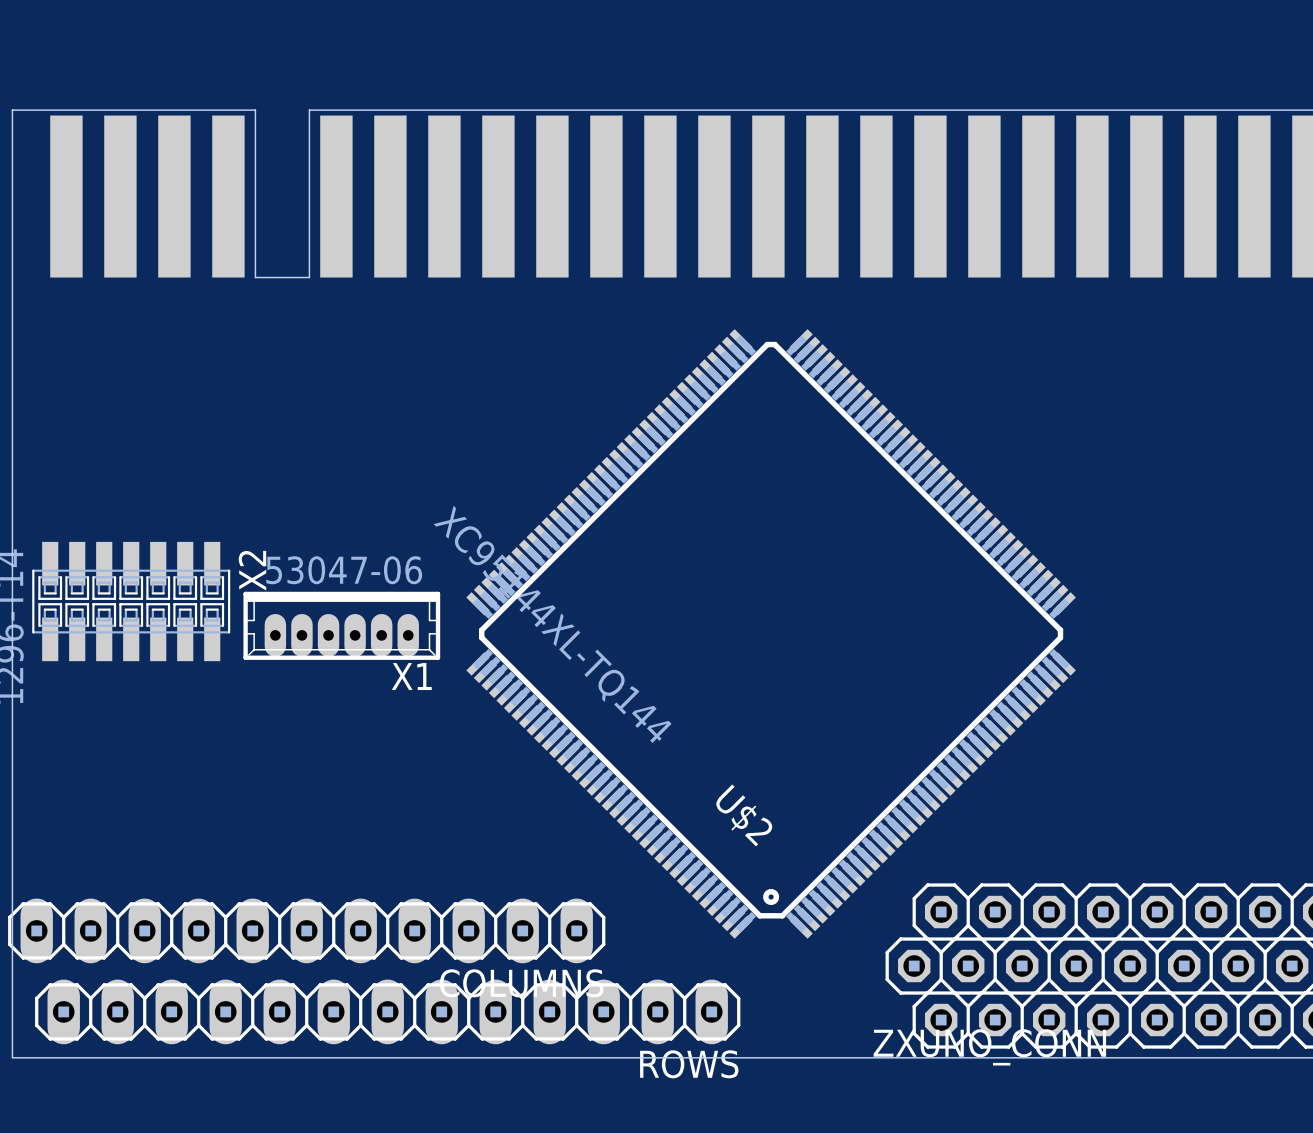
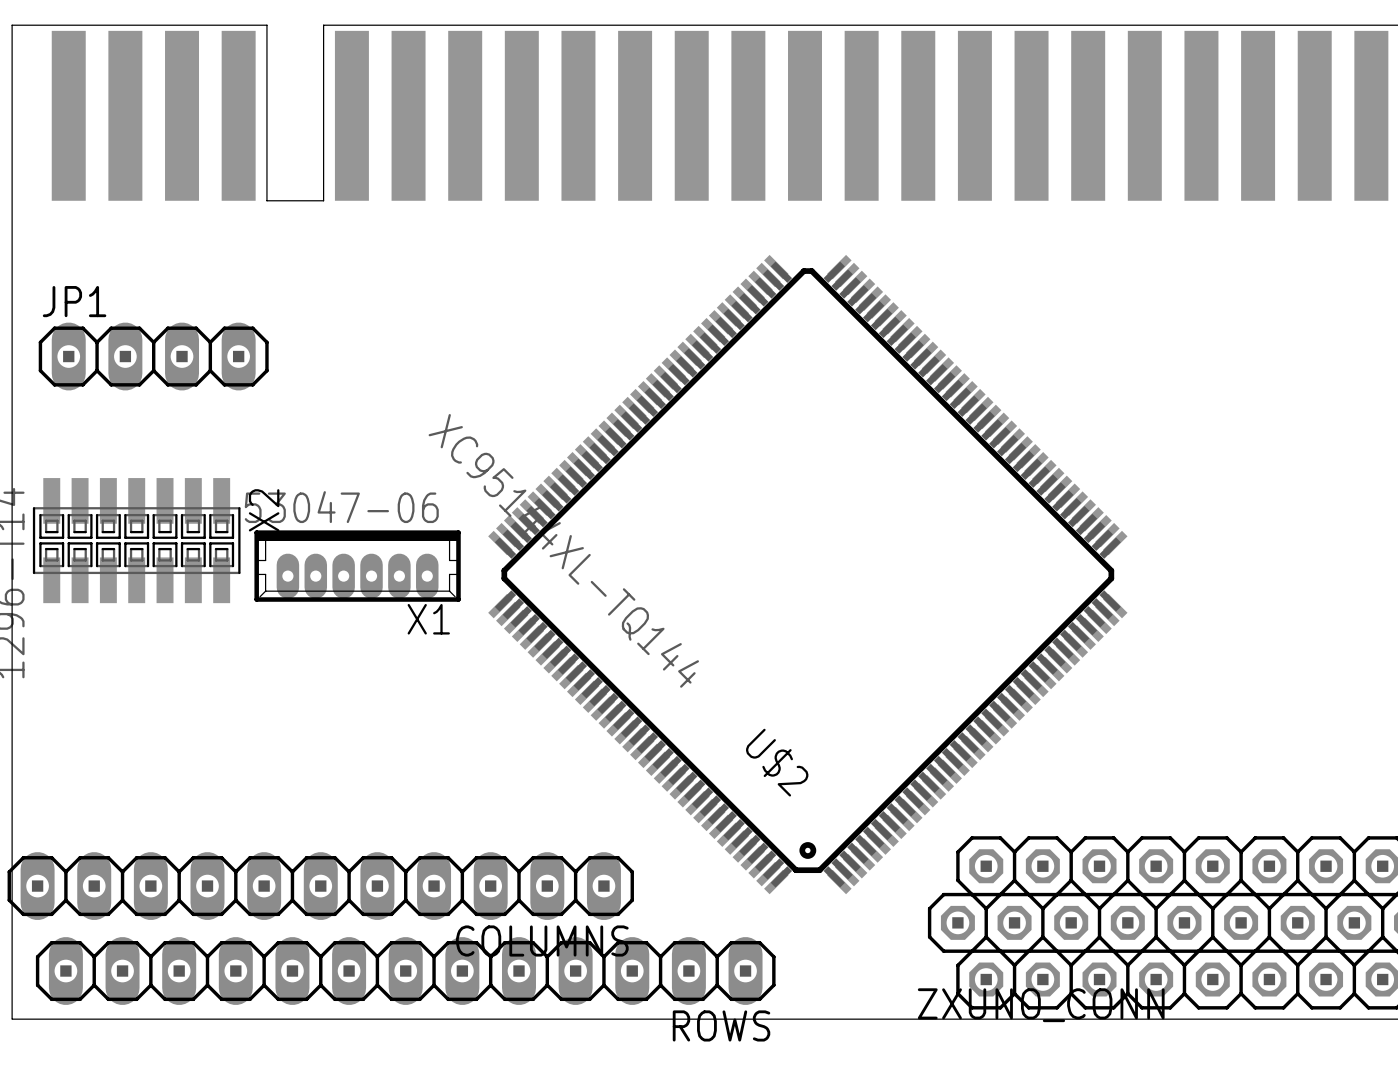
JP1: none -> (153, 356)

